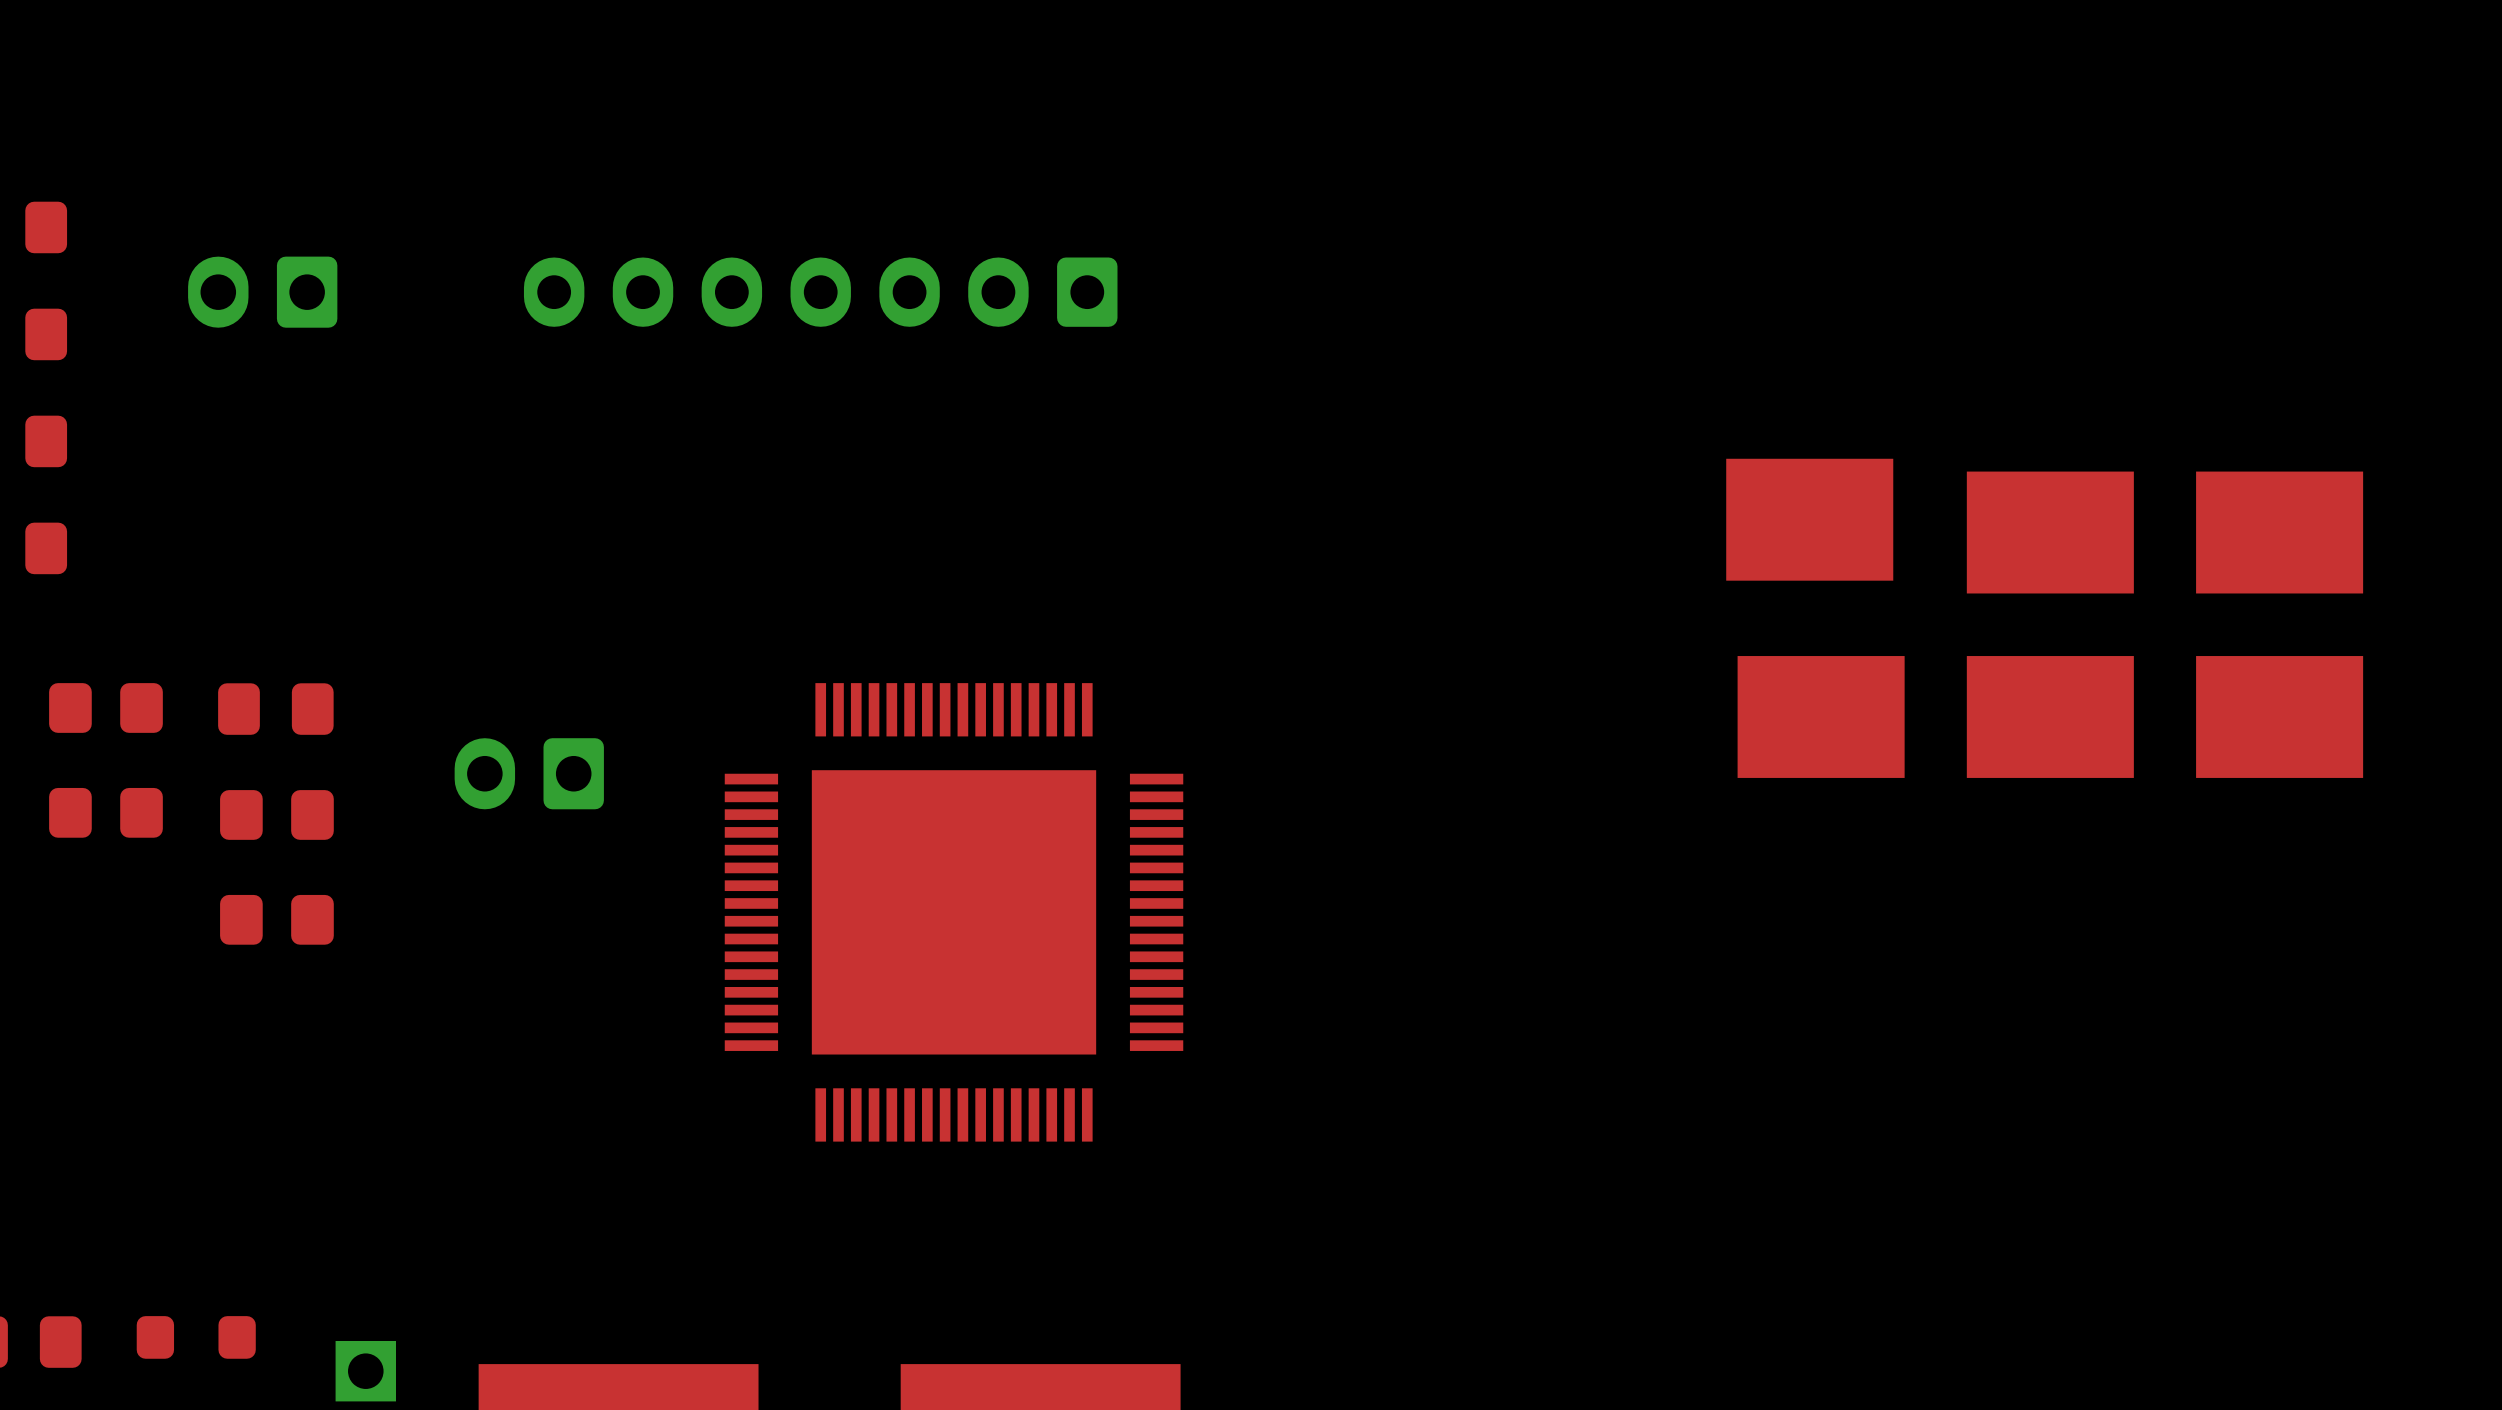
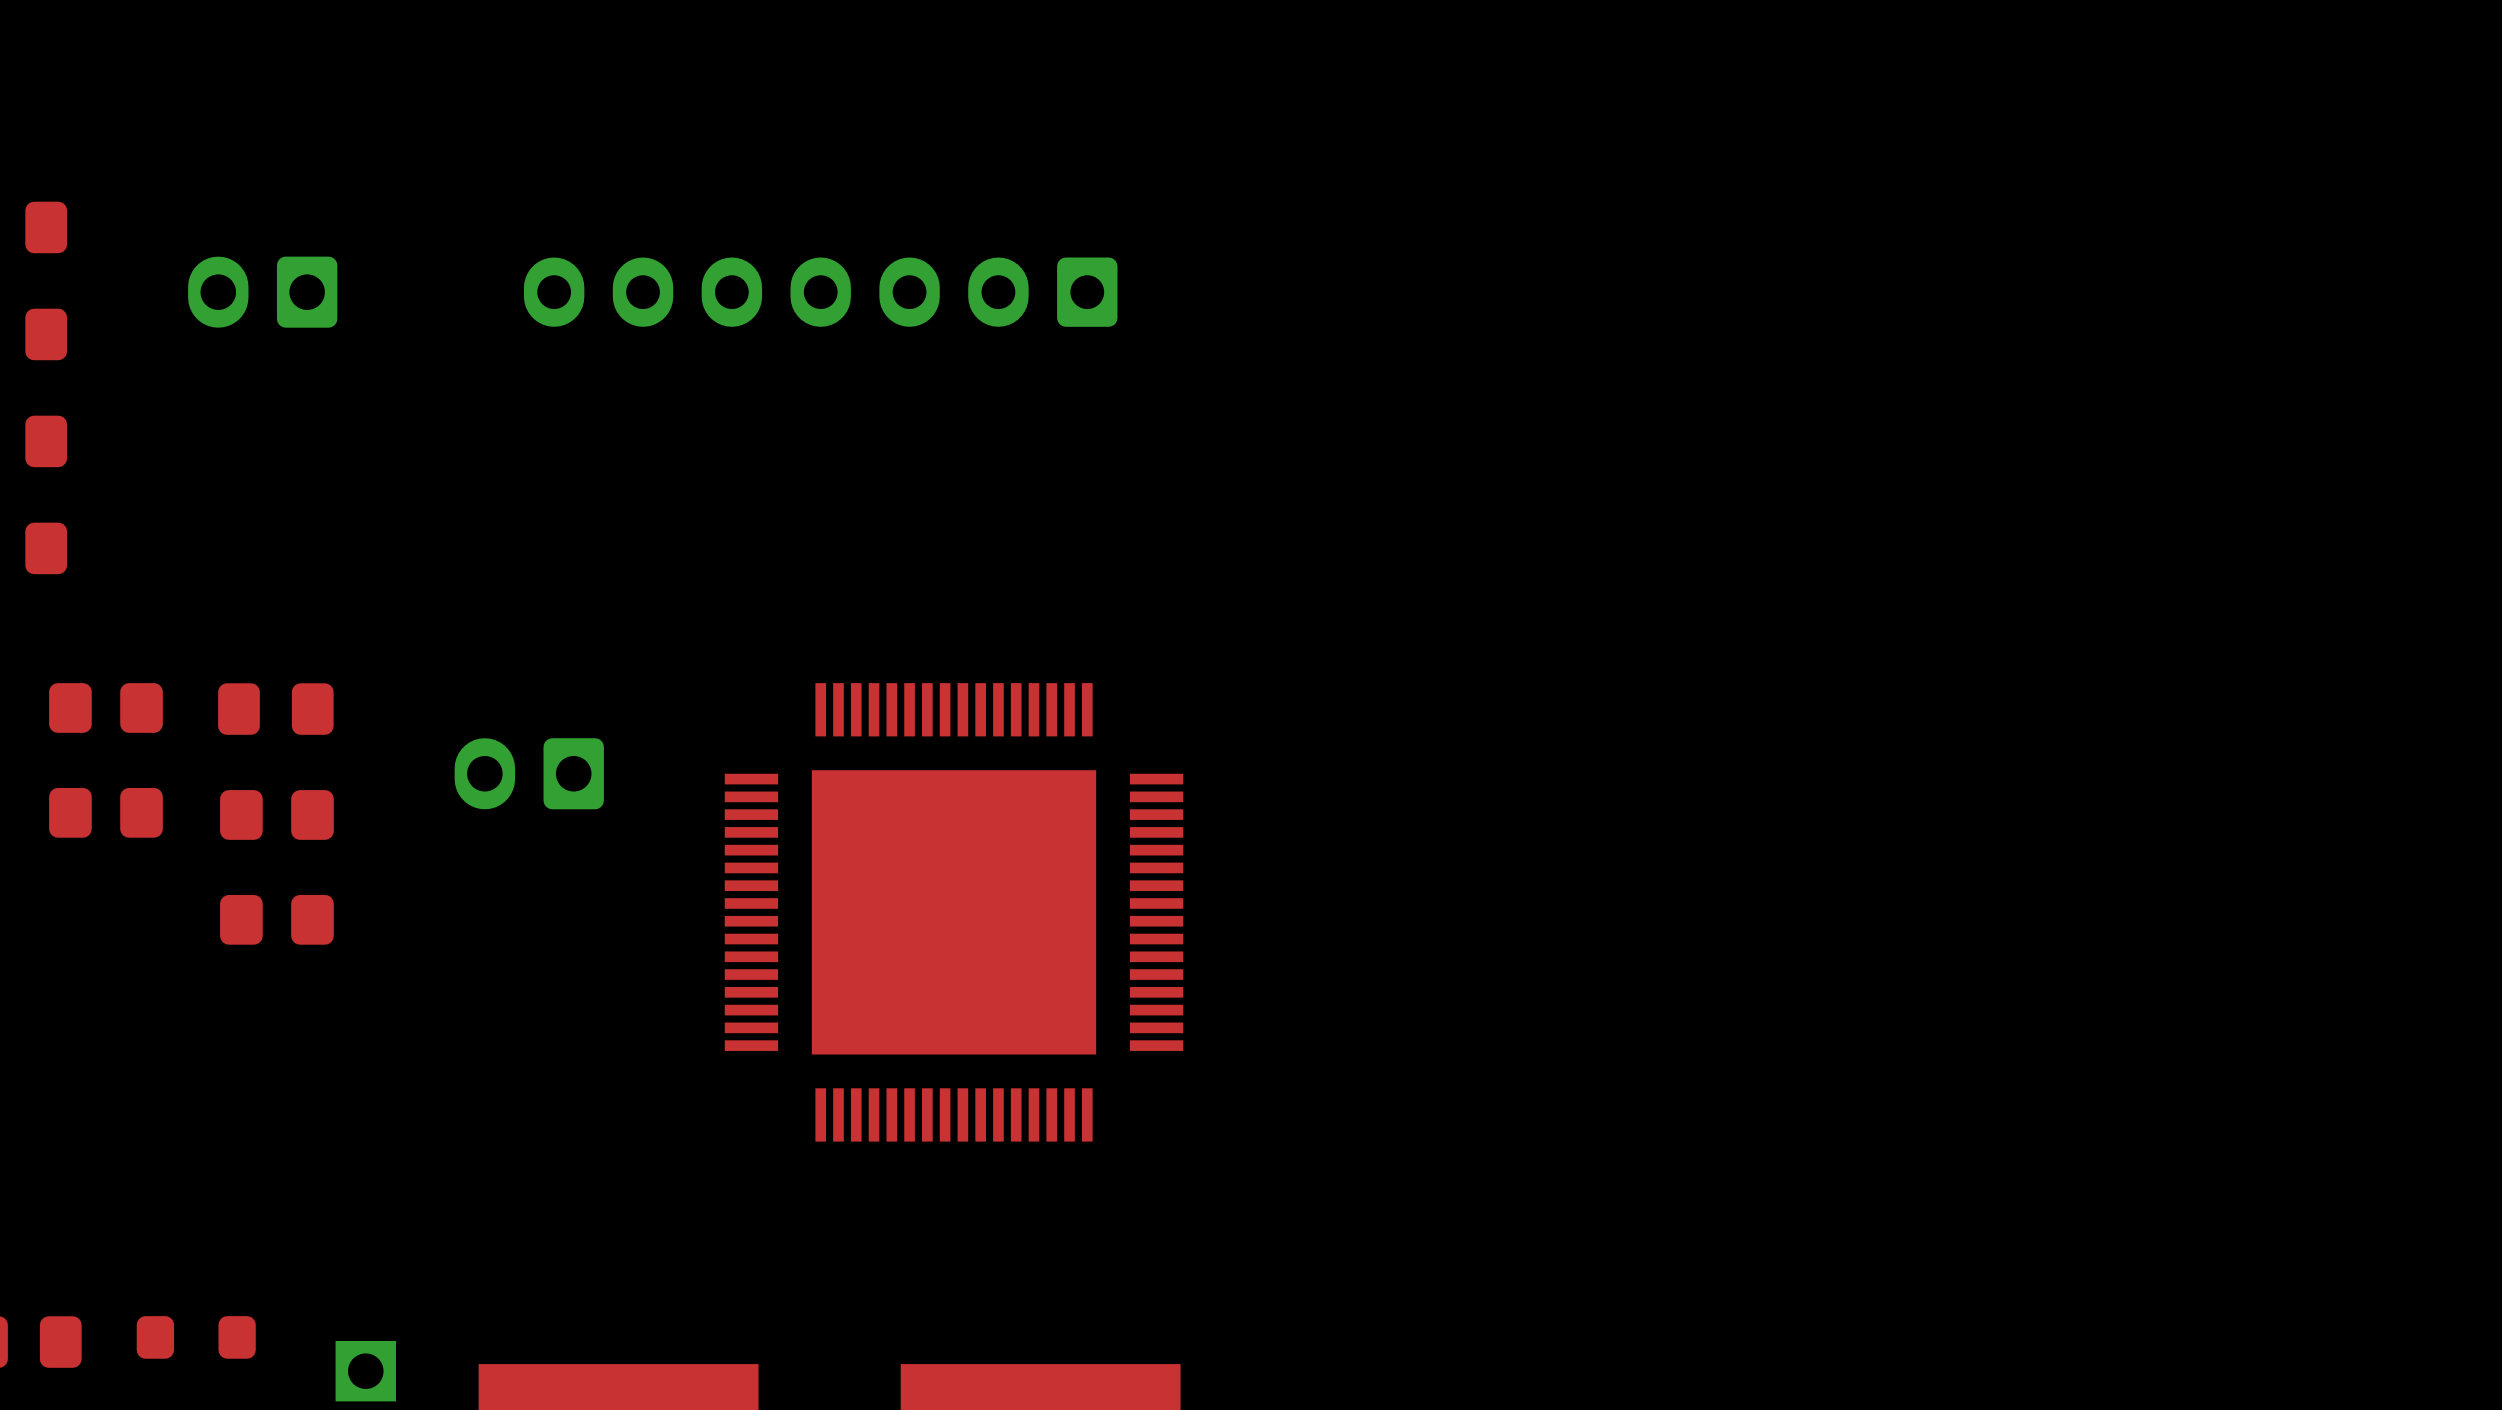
part: (1809, 519) -> none
part: (2050, 532) -> none
part: (2279, 532) -> none
part: (1821, 716) -> none
part: (2050, 716) -> none
part: (2279, 716) -> none

